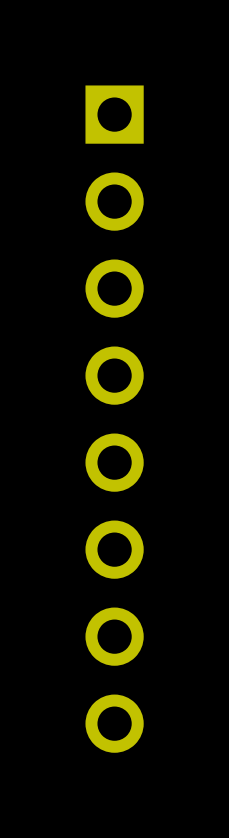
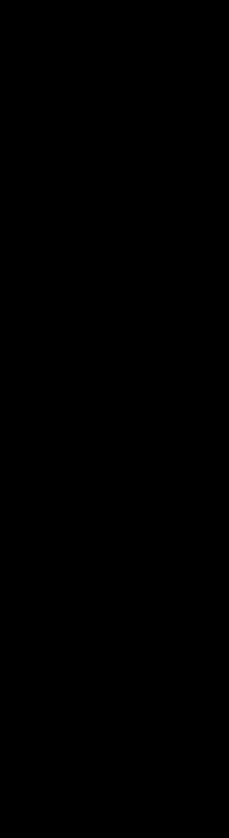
part: (114, 419) -> none

